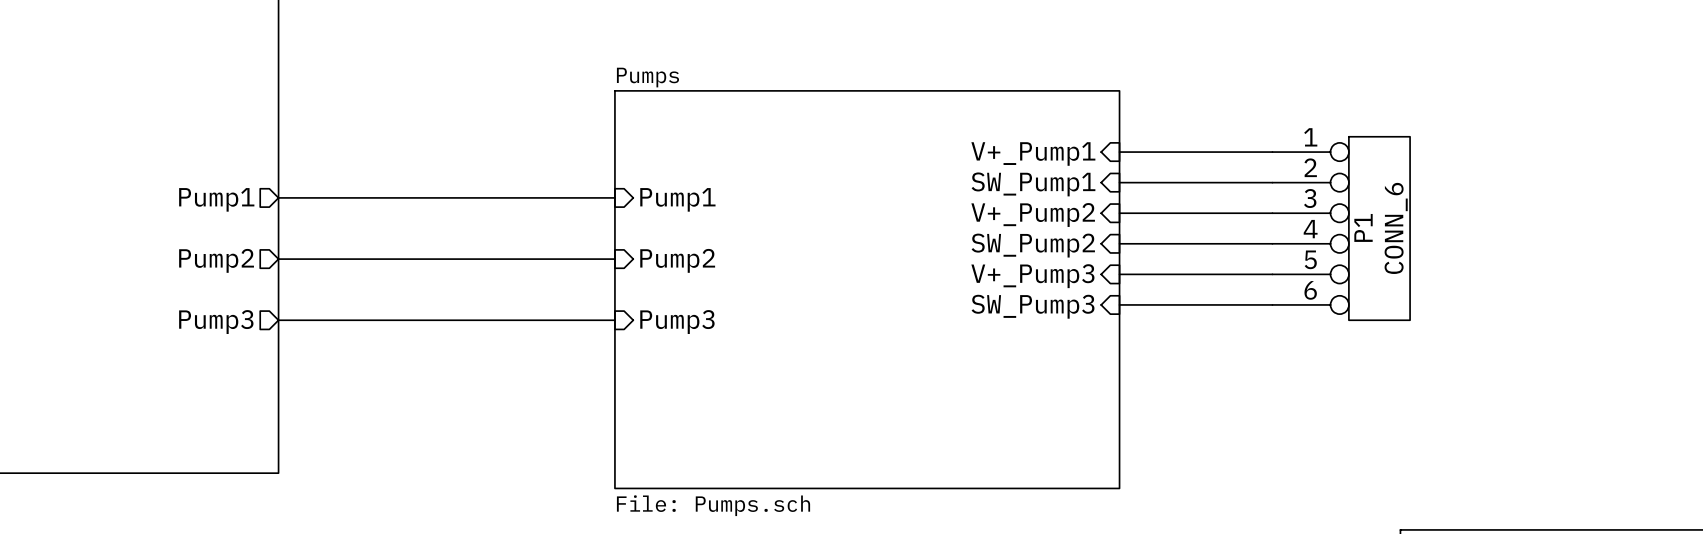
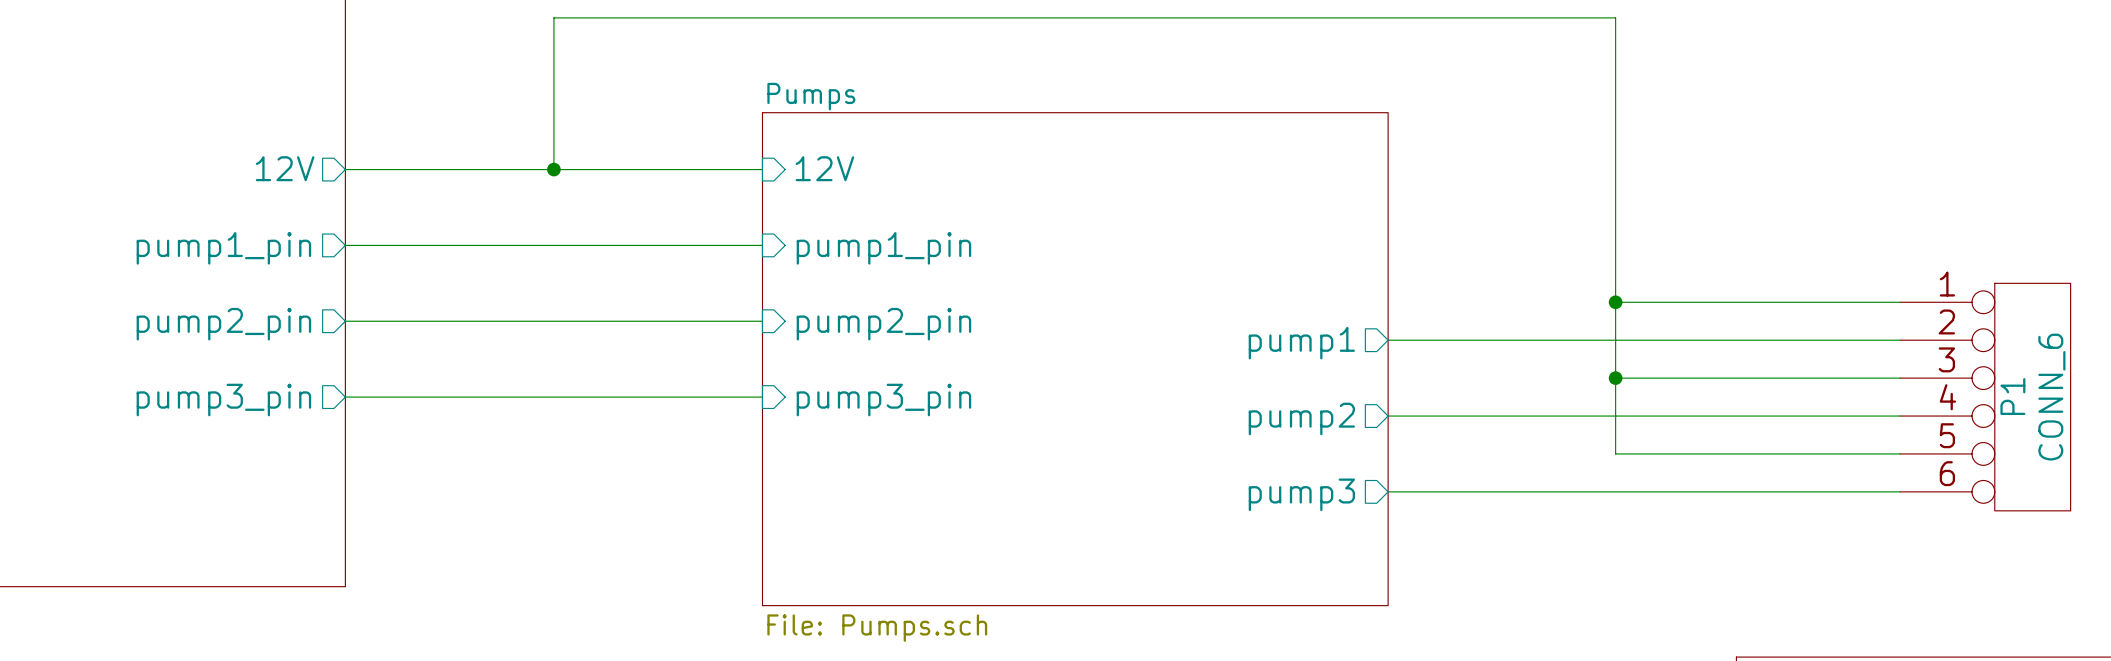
sheet pin: none -> 12V (285, 168)
sheet pin: none -> 12V (824, 168)
wire: none -> (345, 169) (762, 169)
wire: none -> (553, 169) (553, 17) (1615, 17) (1615, 453) (1899, 453)
junction: none -> (553, 169)
wire: (1119, 152) (1272, 152) -> none
sheet pin: V+_Pump1 (1033, 154) -> none
wire: (1119, 182) (1272, 182) -> none
sheet pin: SW_Pump1 (1033, 184) -> none
sheet pin: Pump1 (216, 199) -> pump1_pin (223, 248)
sheet pin: Pump1 (677, 199) -> pump1_pin (883, 248)
wire: (1119, 213) (1272, 213) -> none
sheet pin: V+_Pump2 (1033, 215) -> none
P1 position: (1341, 228) -> (1985, 397)
wire: (1119, 243) (1272, 243) -> none
wire: none -> (1615, 302) (1899, 302)
junction: none -> (1615, 302)
sheet pin: SW_Pump2 (1033, 245) -> none
sheet pin: Pump2 (216, 260) -> pump2_pin (223, 324)
sheet pin: Pump2 (677, 260) -> pump2_pin (883, 324)
wire: none -> (1577, 340) (1899, 340)
sheet pin shape: input (1032, 276) -> output (1301, 343)
sheet pin: V+_Pump3 (1032, 276) -> pump1 (1301, 343)
wire: (1119, 304) (1272, 304) -> none
wire: none -> (1615, 378) (1899, 378)
junction: none -> (1615, 378)
sheet pin: SW_Pump3 (1033, 306) -> none
sheet pin: Pump3 (216, 322) -> pump3_pin (223, 400)
sheet pin: Pump3 (677, 322) -> pump3_pin (883, 400)
wire: none -> (1388, 416) (1899, 416)
sheet pin: none -> pump2 (1301, 418)
wire: none -> (1388, 491) (1899, 491)
sheet pin: none -> pump3 (1301, 494)

